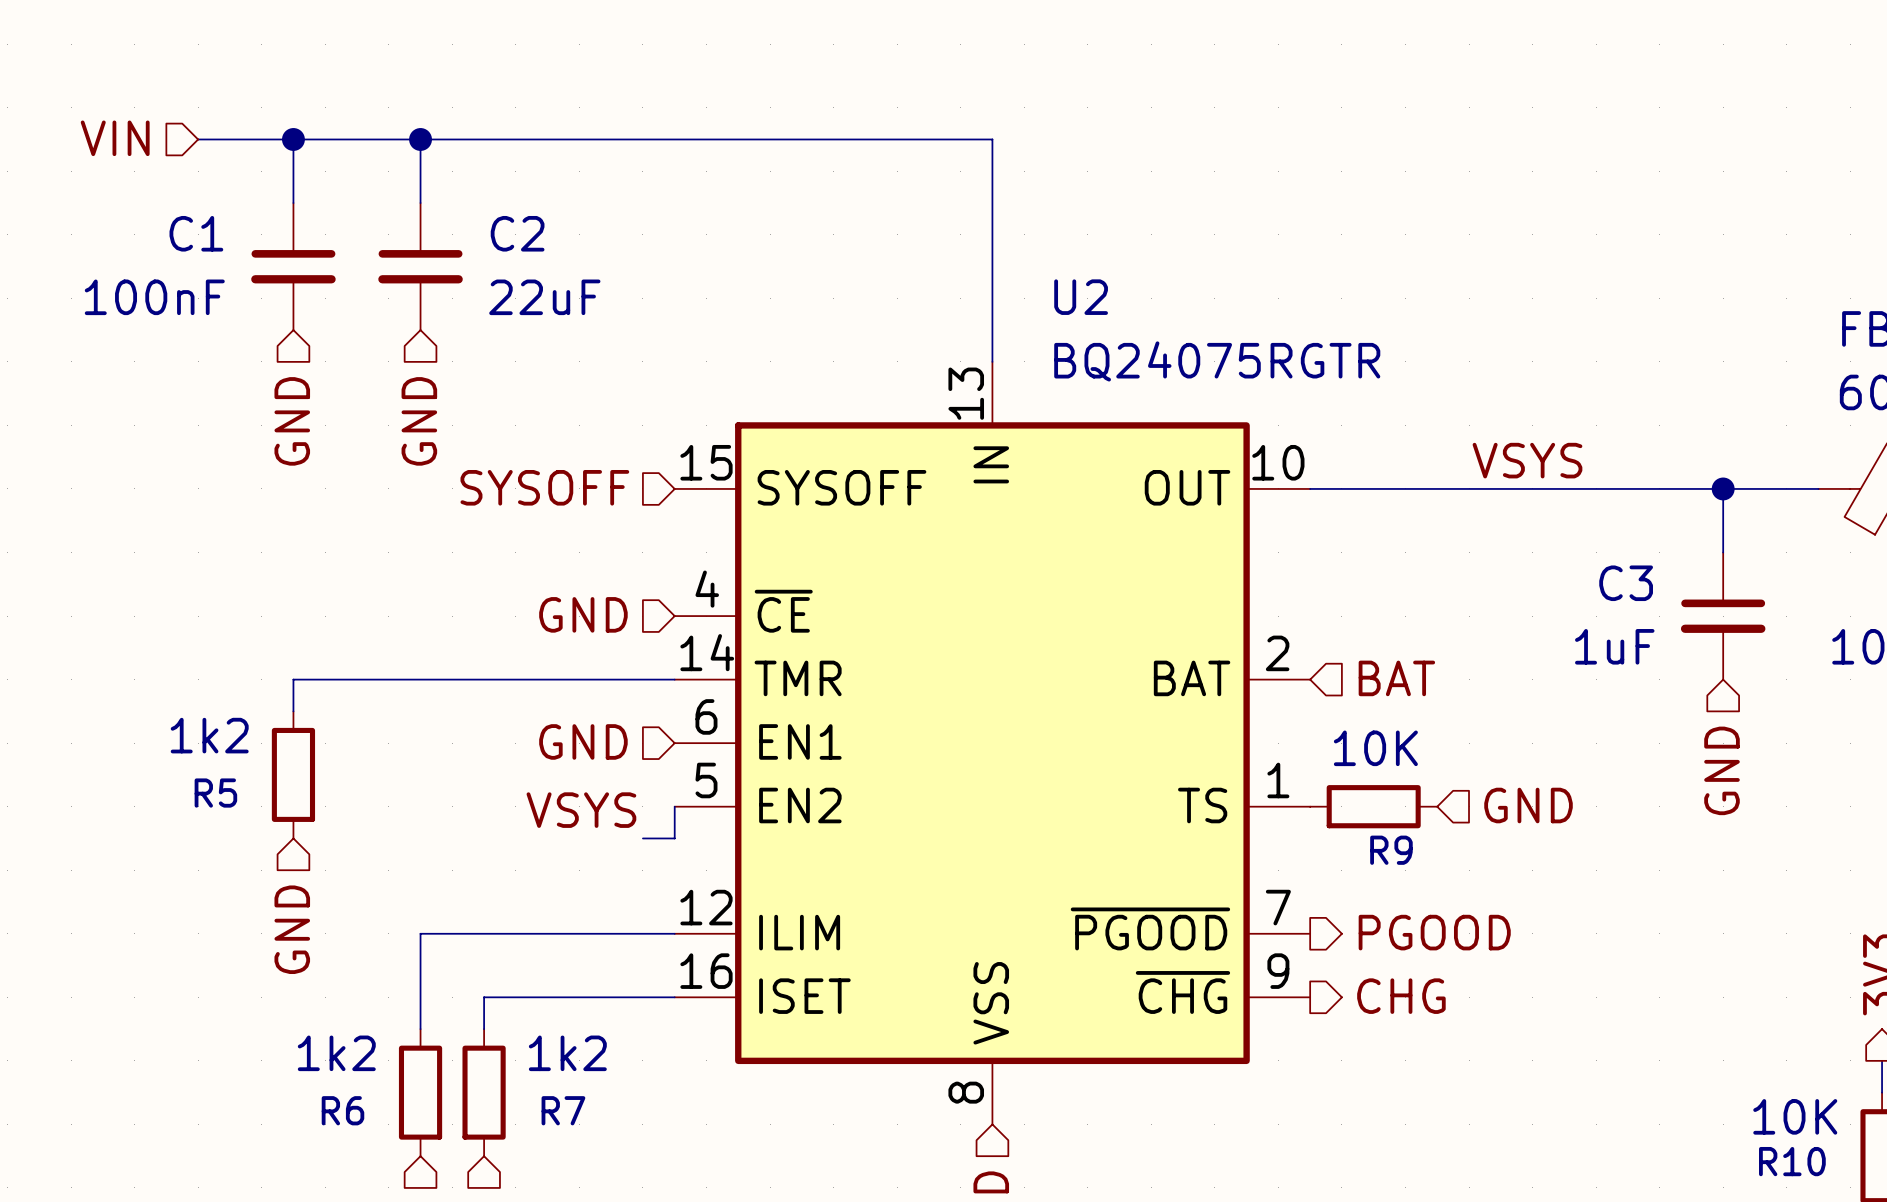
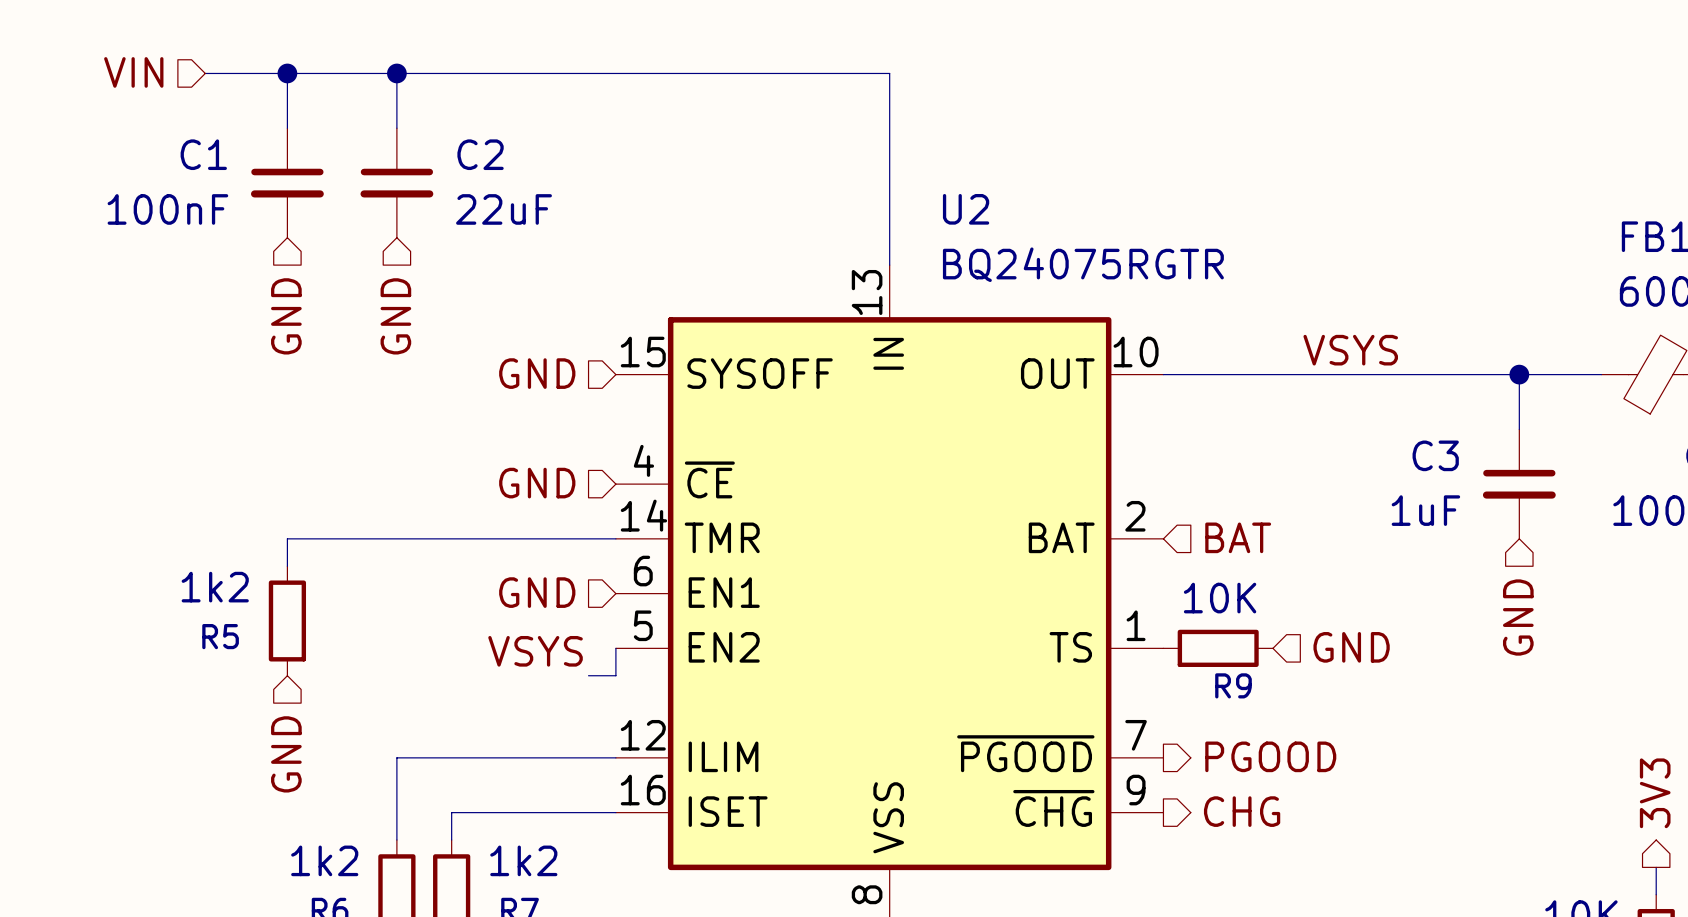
hierarchical label: SYSOFF (544, 487) -> GND (537, 373)

